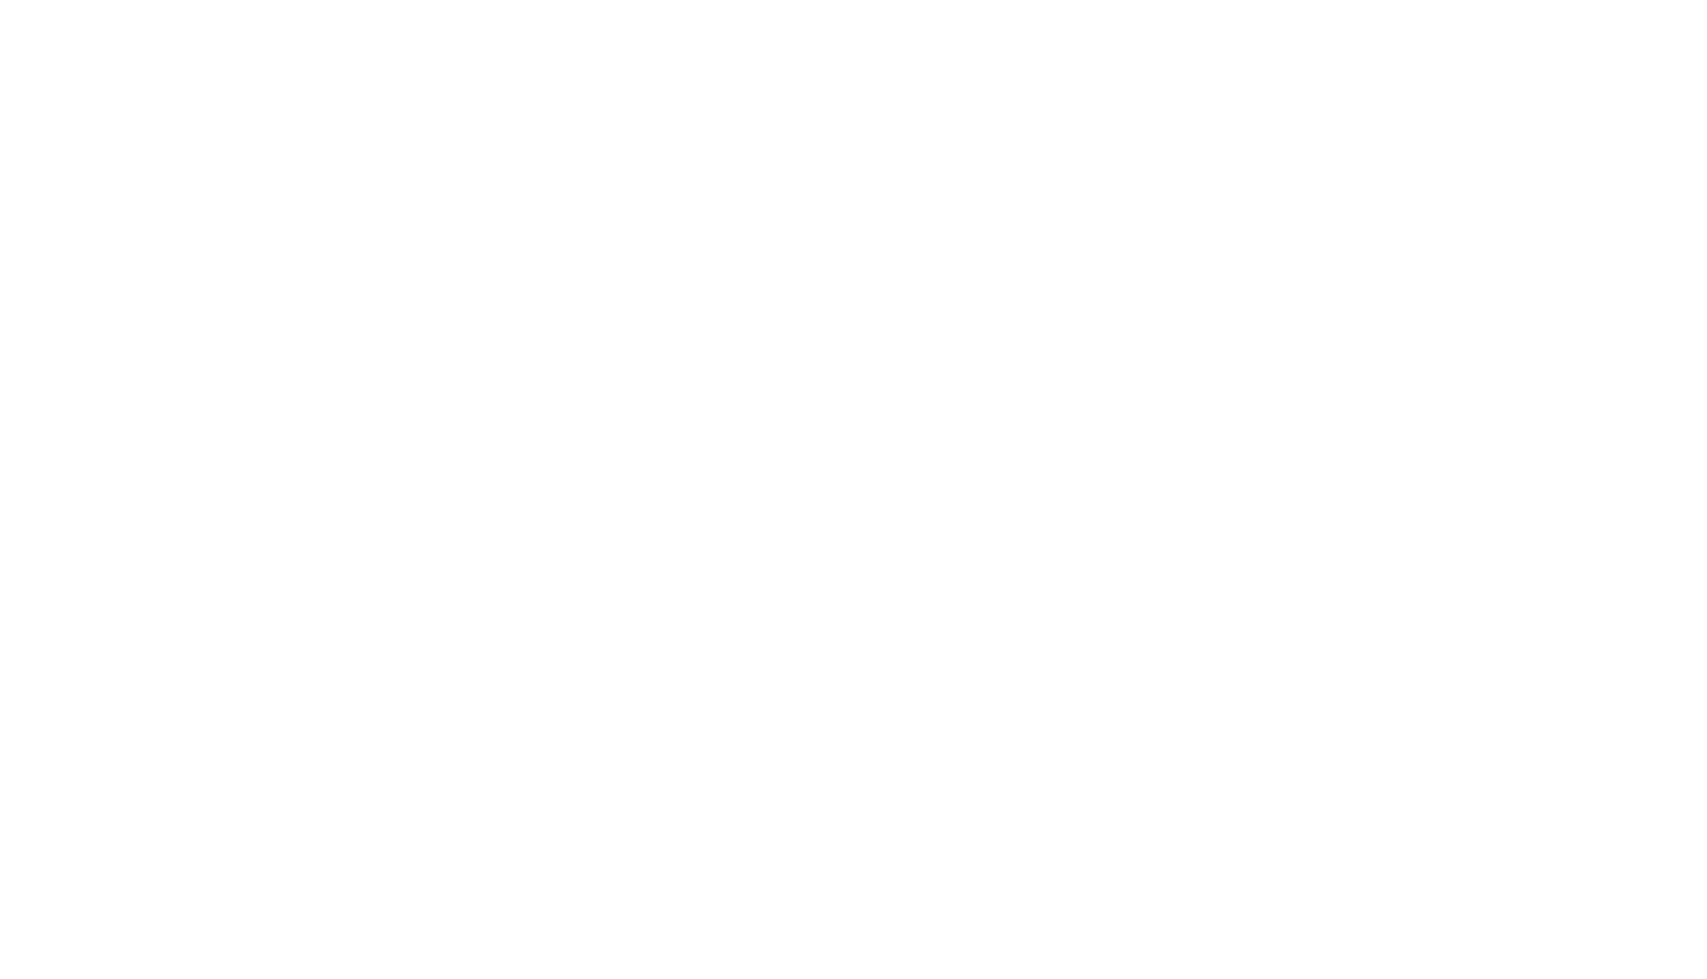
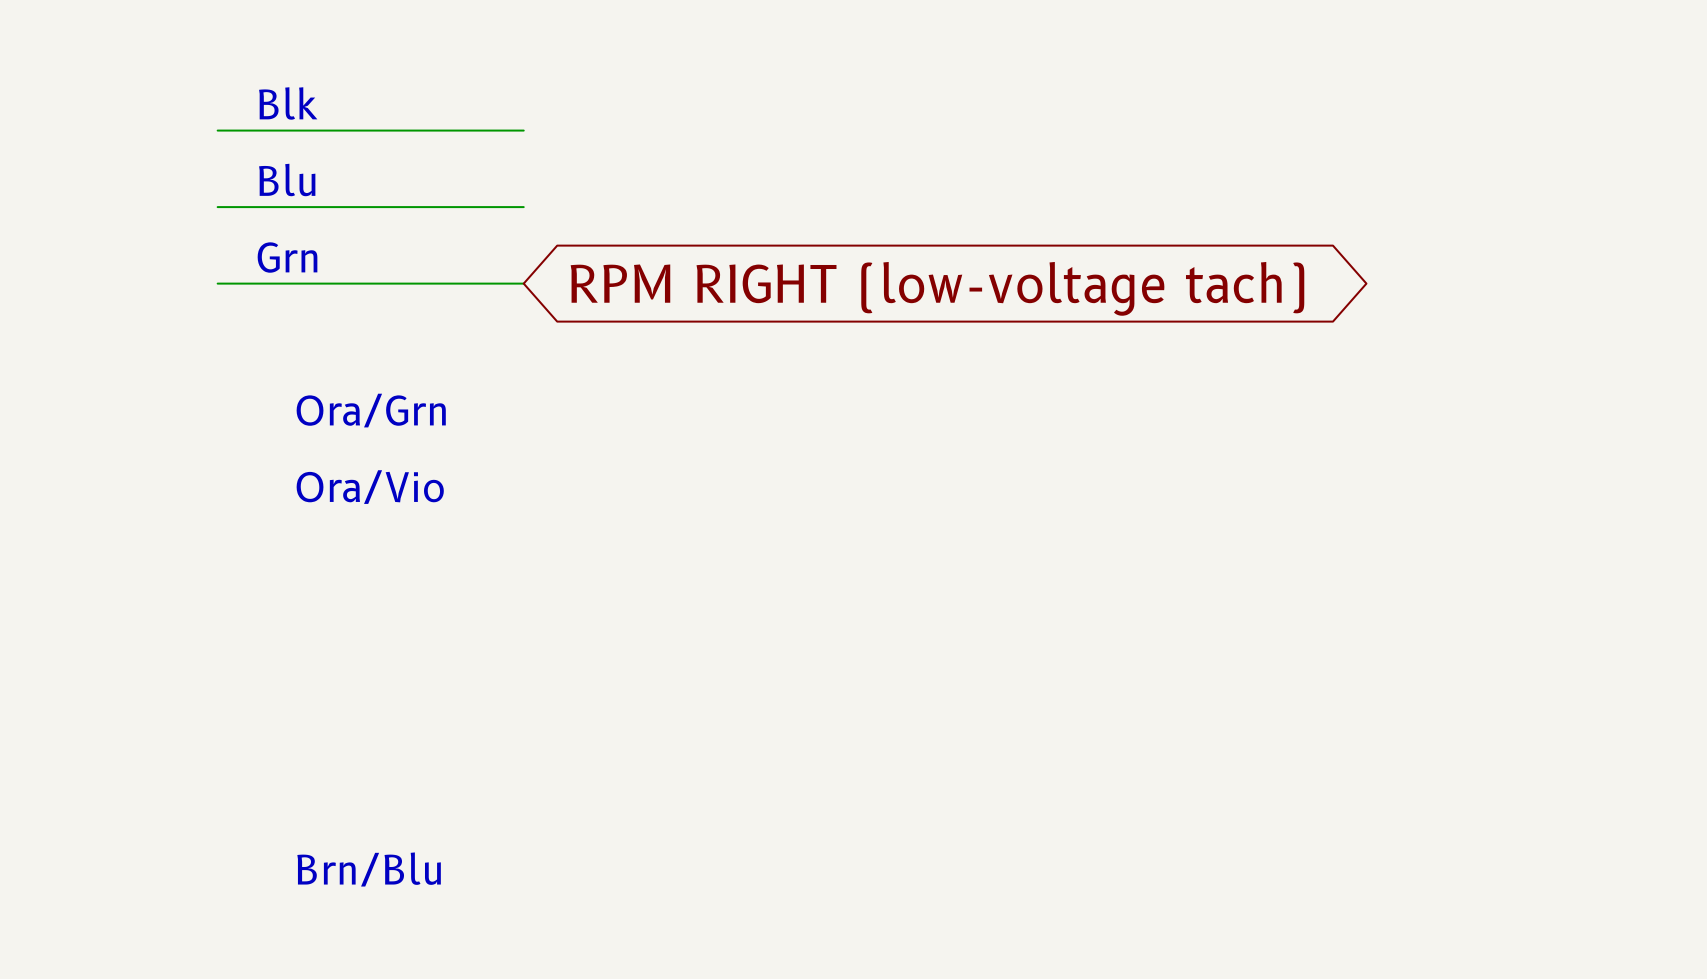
text: none -> Blk (288, 103)
wire: none -> (217, 130) (523, 130)
text: none -> Blu (287, 179)
wire: none -> (217, 207) (523, 207)
text: none -> Grn (287, 257)
wire: none -> (217, 283) (523, 283)
global label: none -> RPM RIGHT (low-voltage tach) (937, 288)
text: none -> Ora/Grn (371, 410)
text: none -> Ora/Vio (370, 487)
text: none -> Brn/Blu (369, 869)

